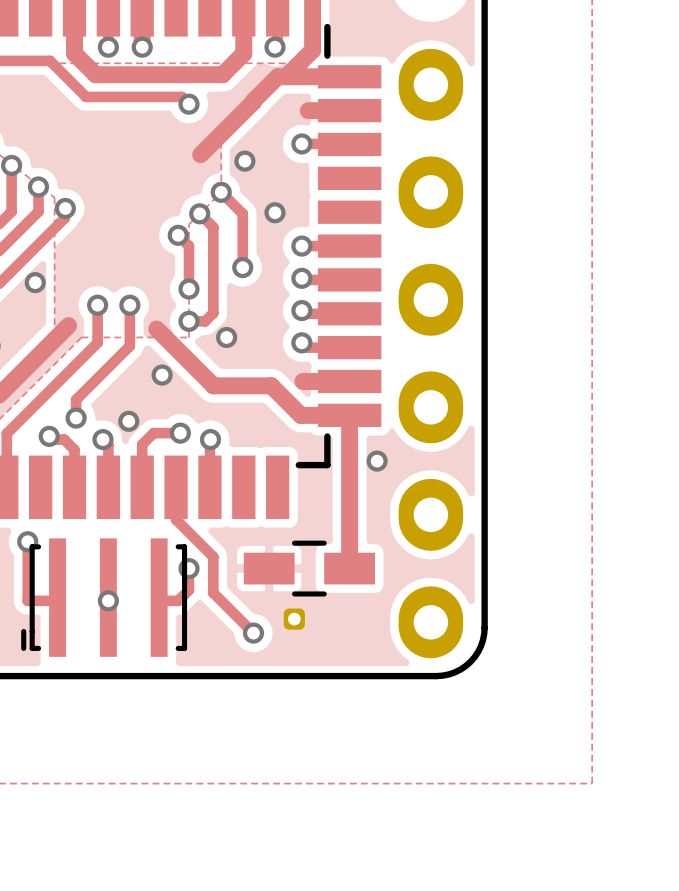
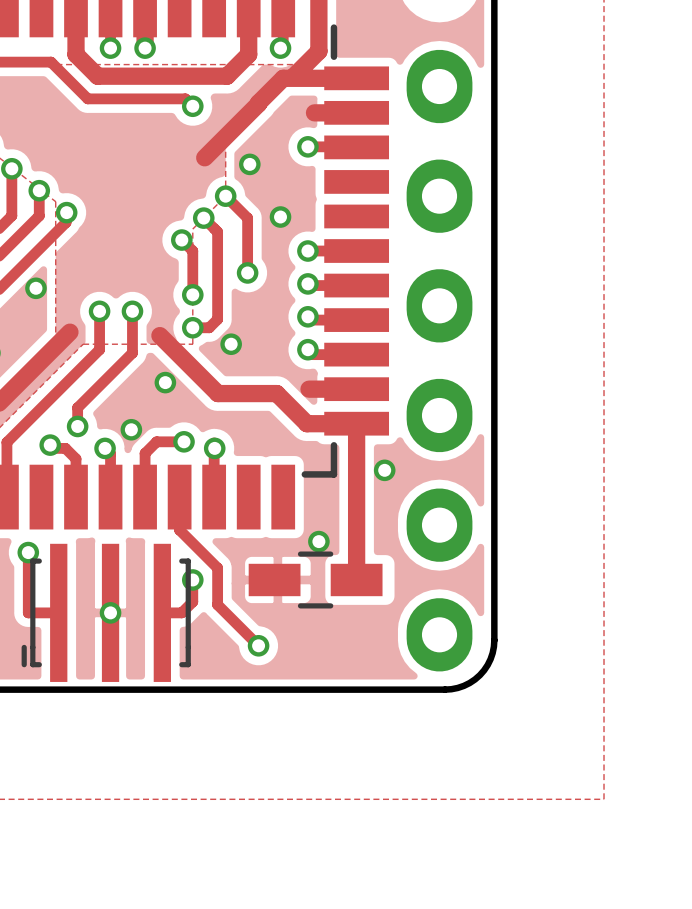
via: none -> (318, 541)
part footprint: [21, 538, 188, 657] -> [21, 543, 191, 682]
part: (294, 619) -> none

